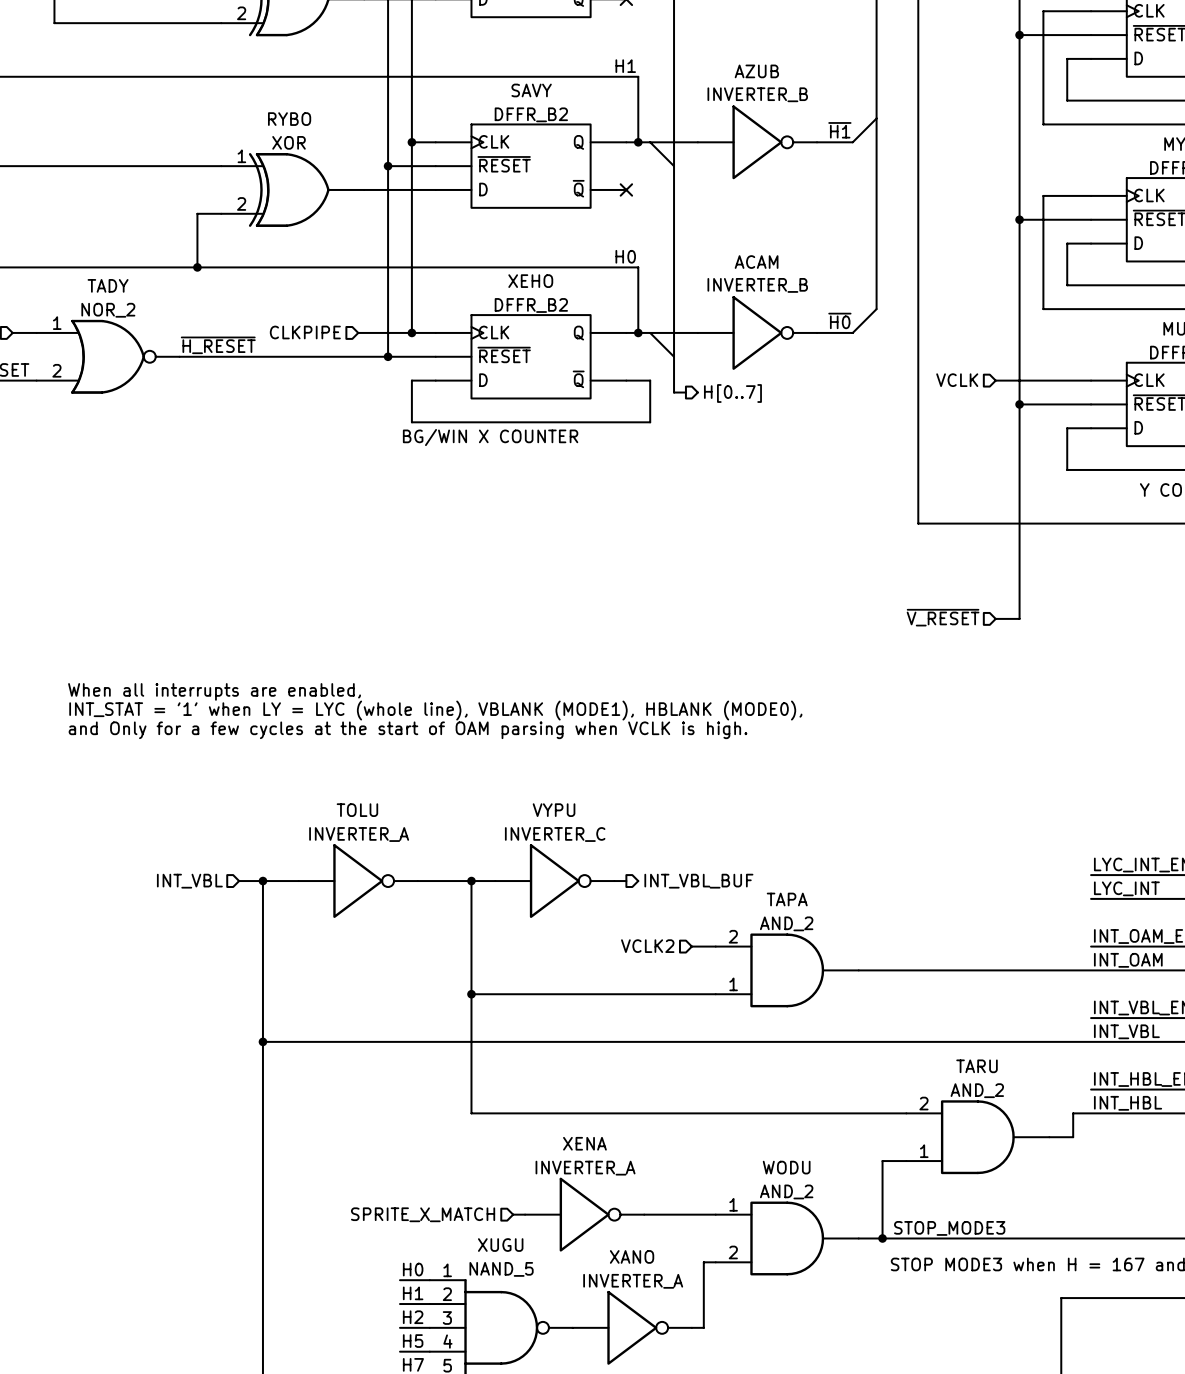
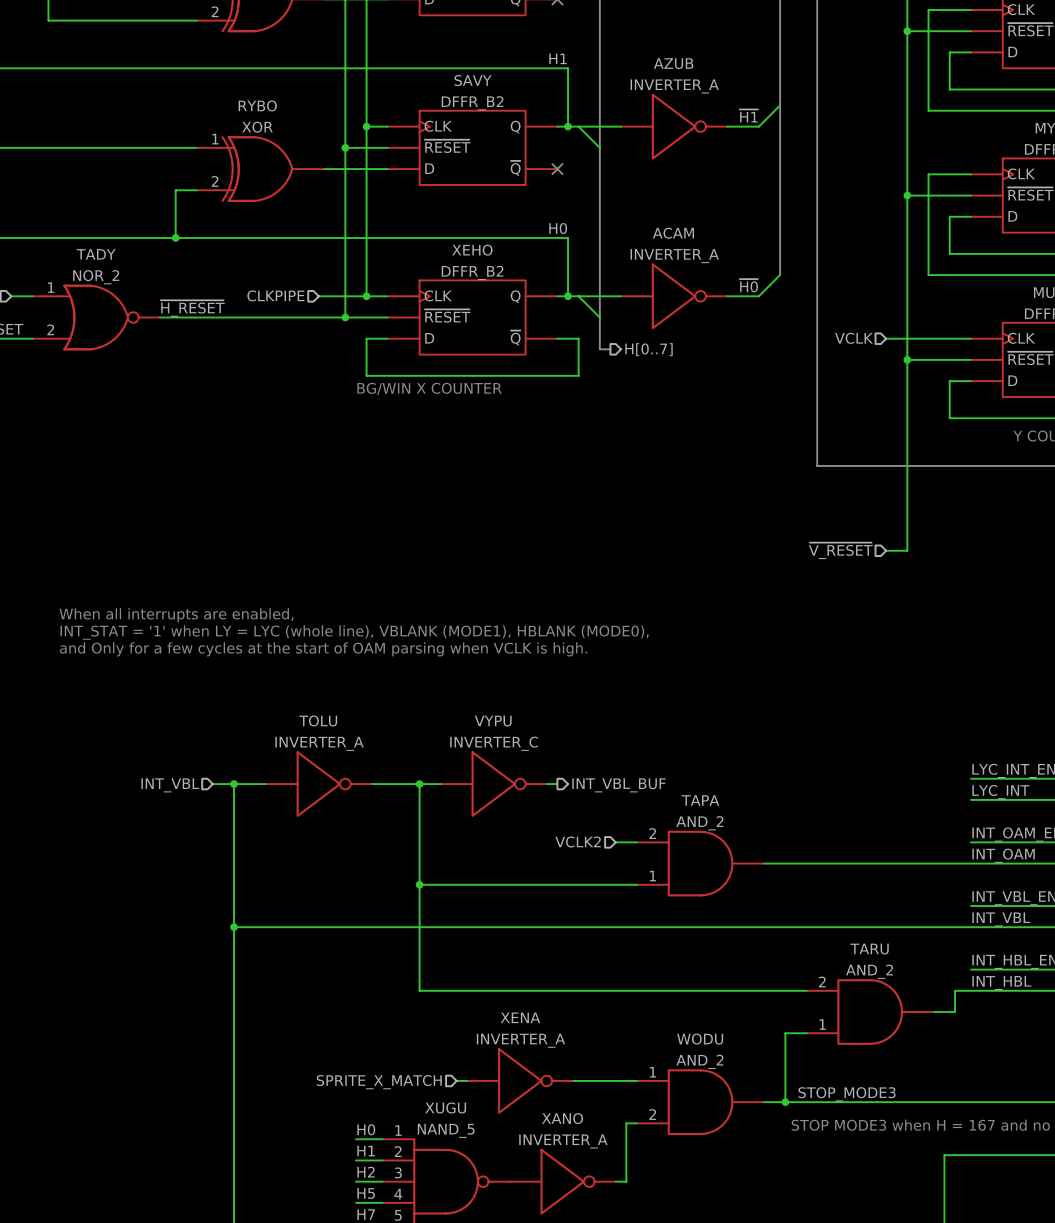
AZUB value: INVERTER_B (757, 94) -> INVERTER_A (674, 86)
ACAM value: INVERTER_B (757, 285) -> INVERTER_A (674, 256)

